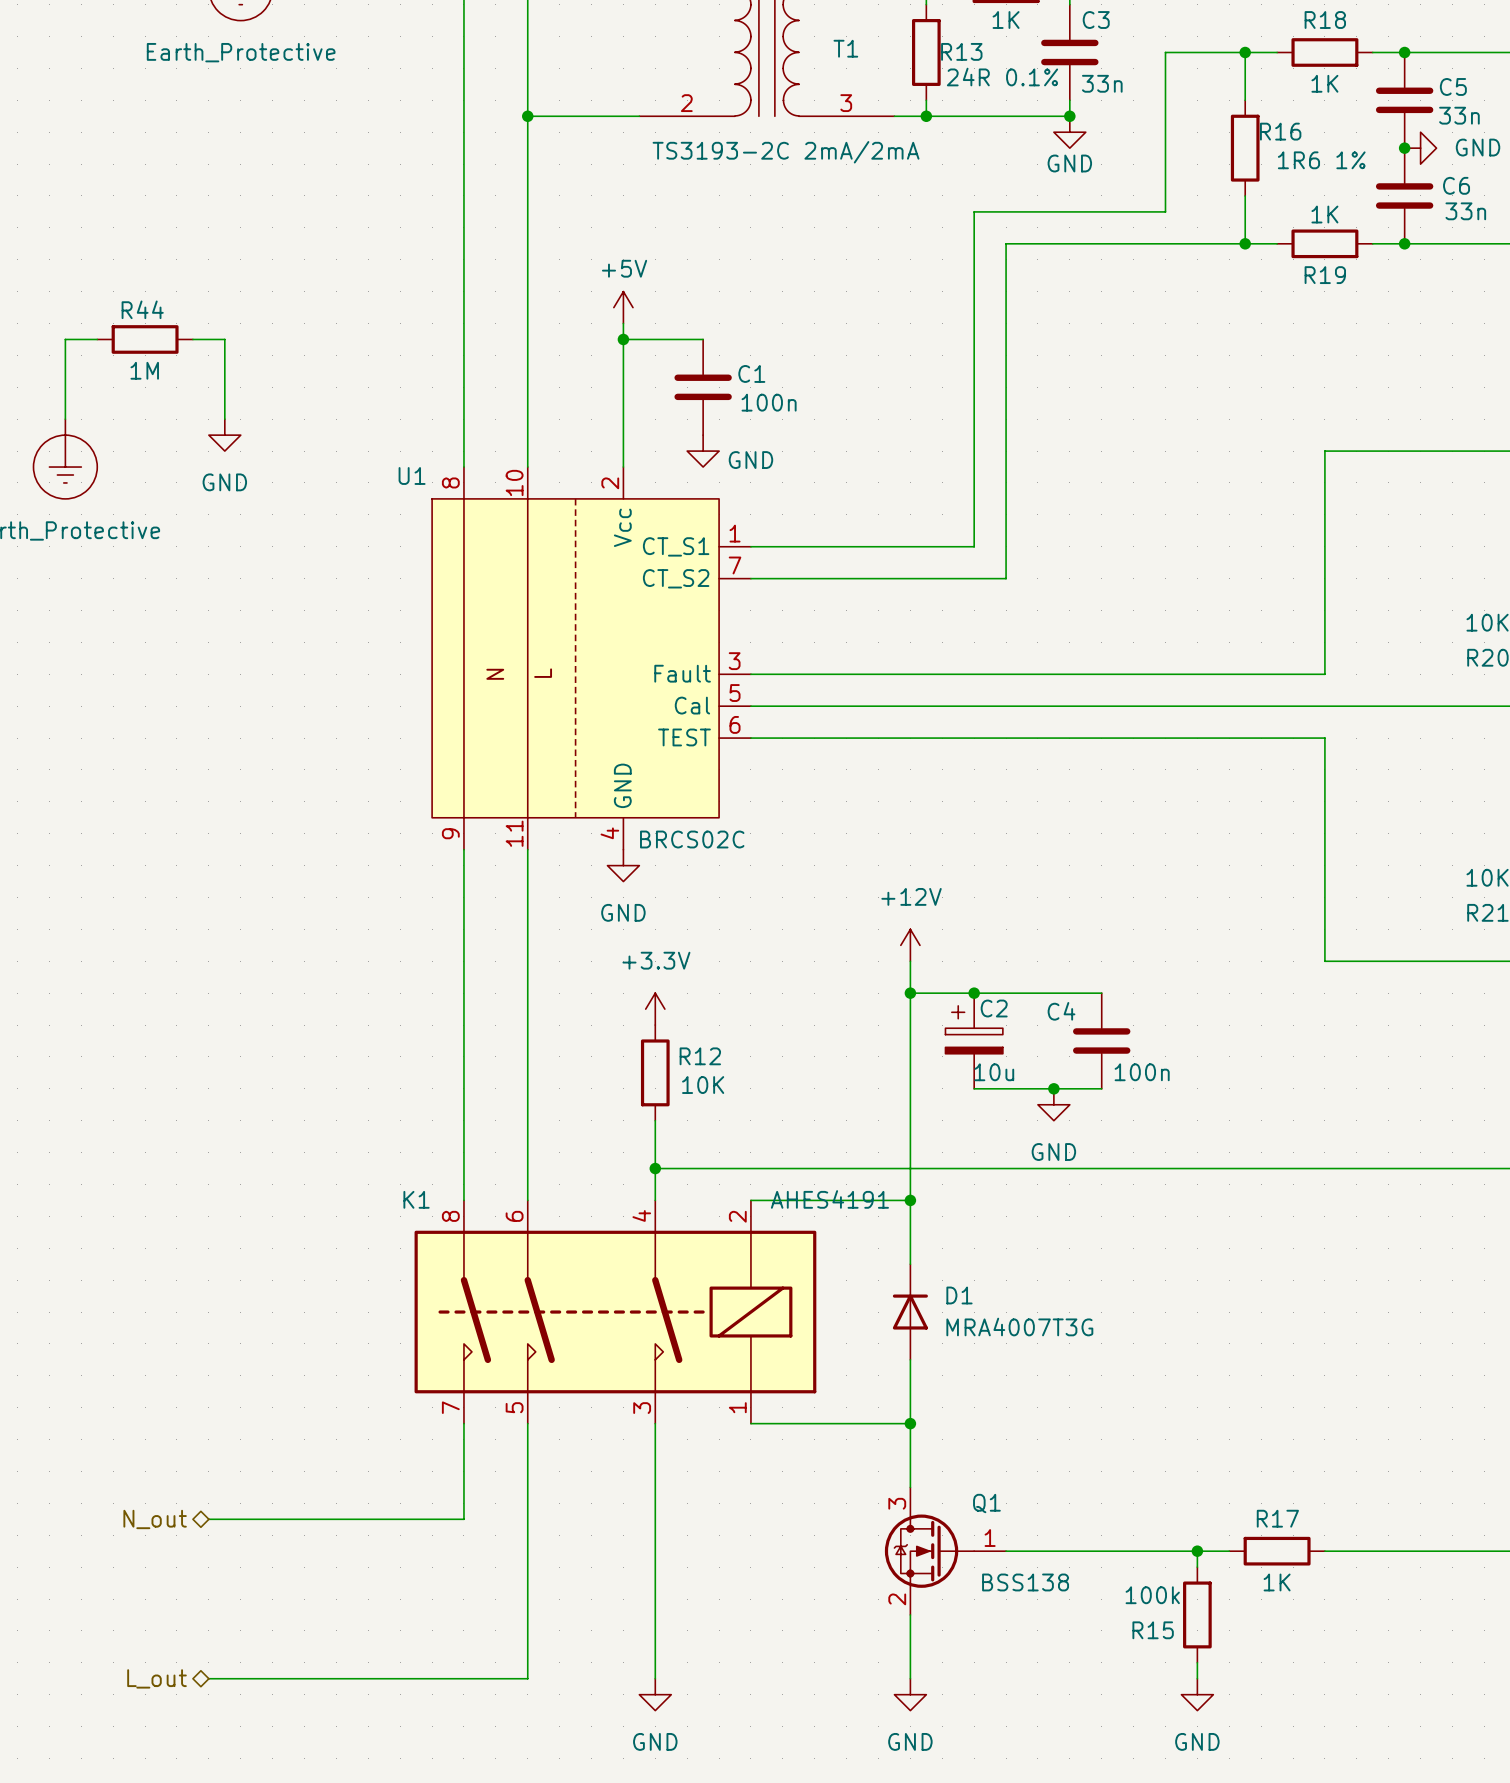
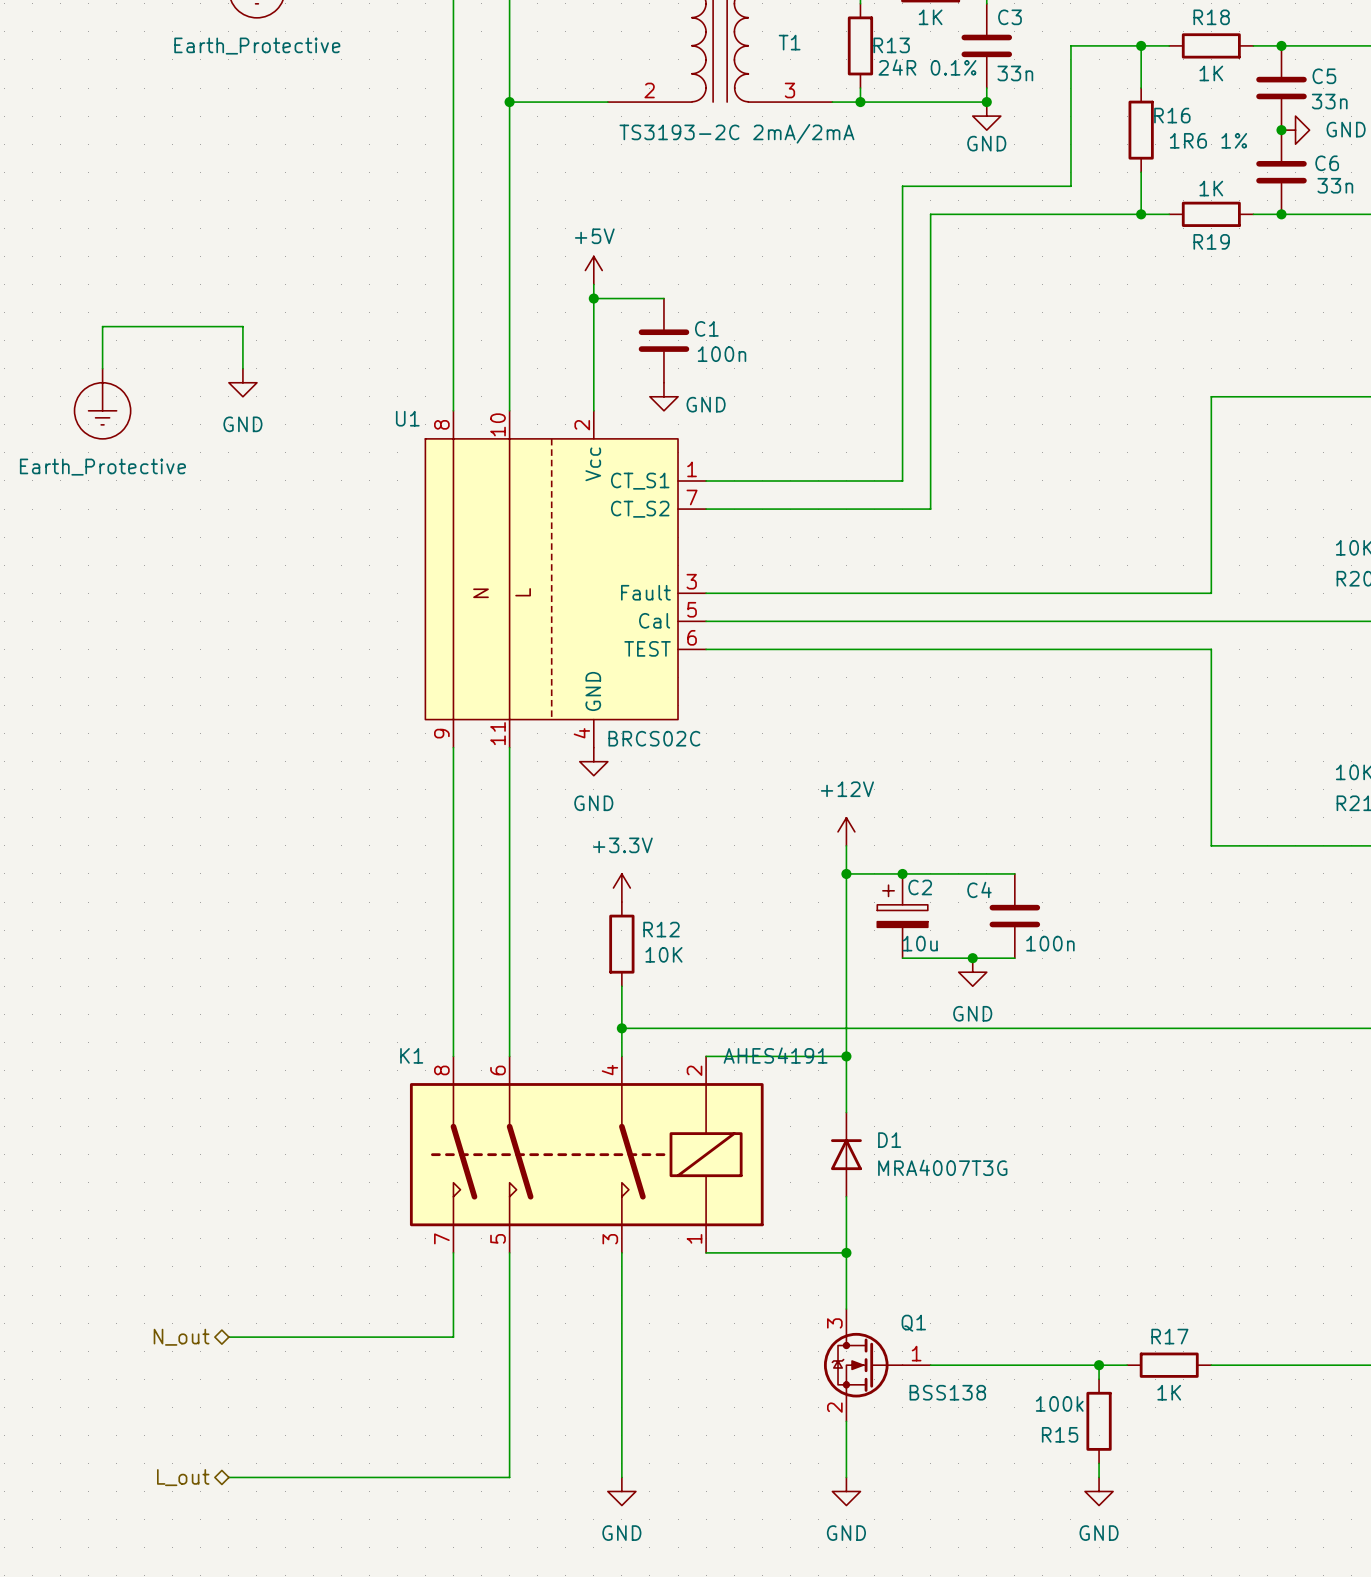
wire: (97, 339) (65, 339) (65, 371) -> (242, 326) (102, 326)
R44: 1M (145, 339) -> none
wire: (192, 339) (224, 339) (224, 371) -> none

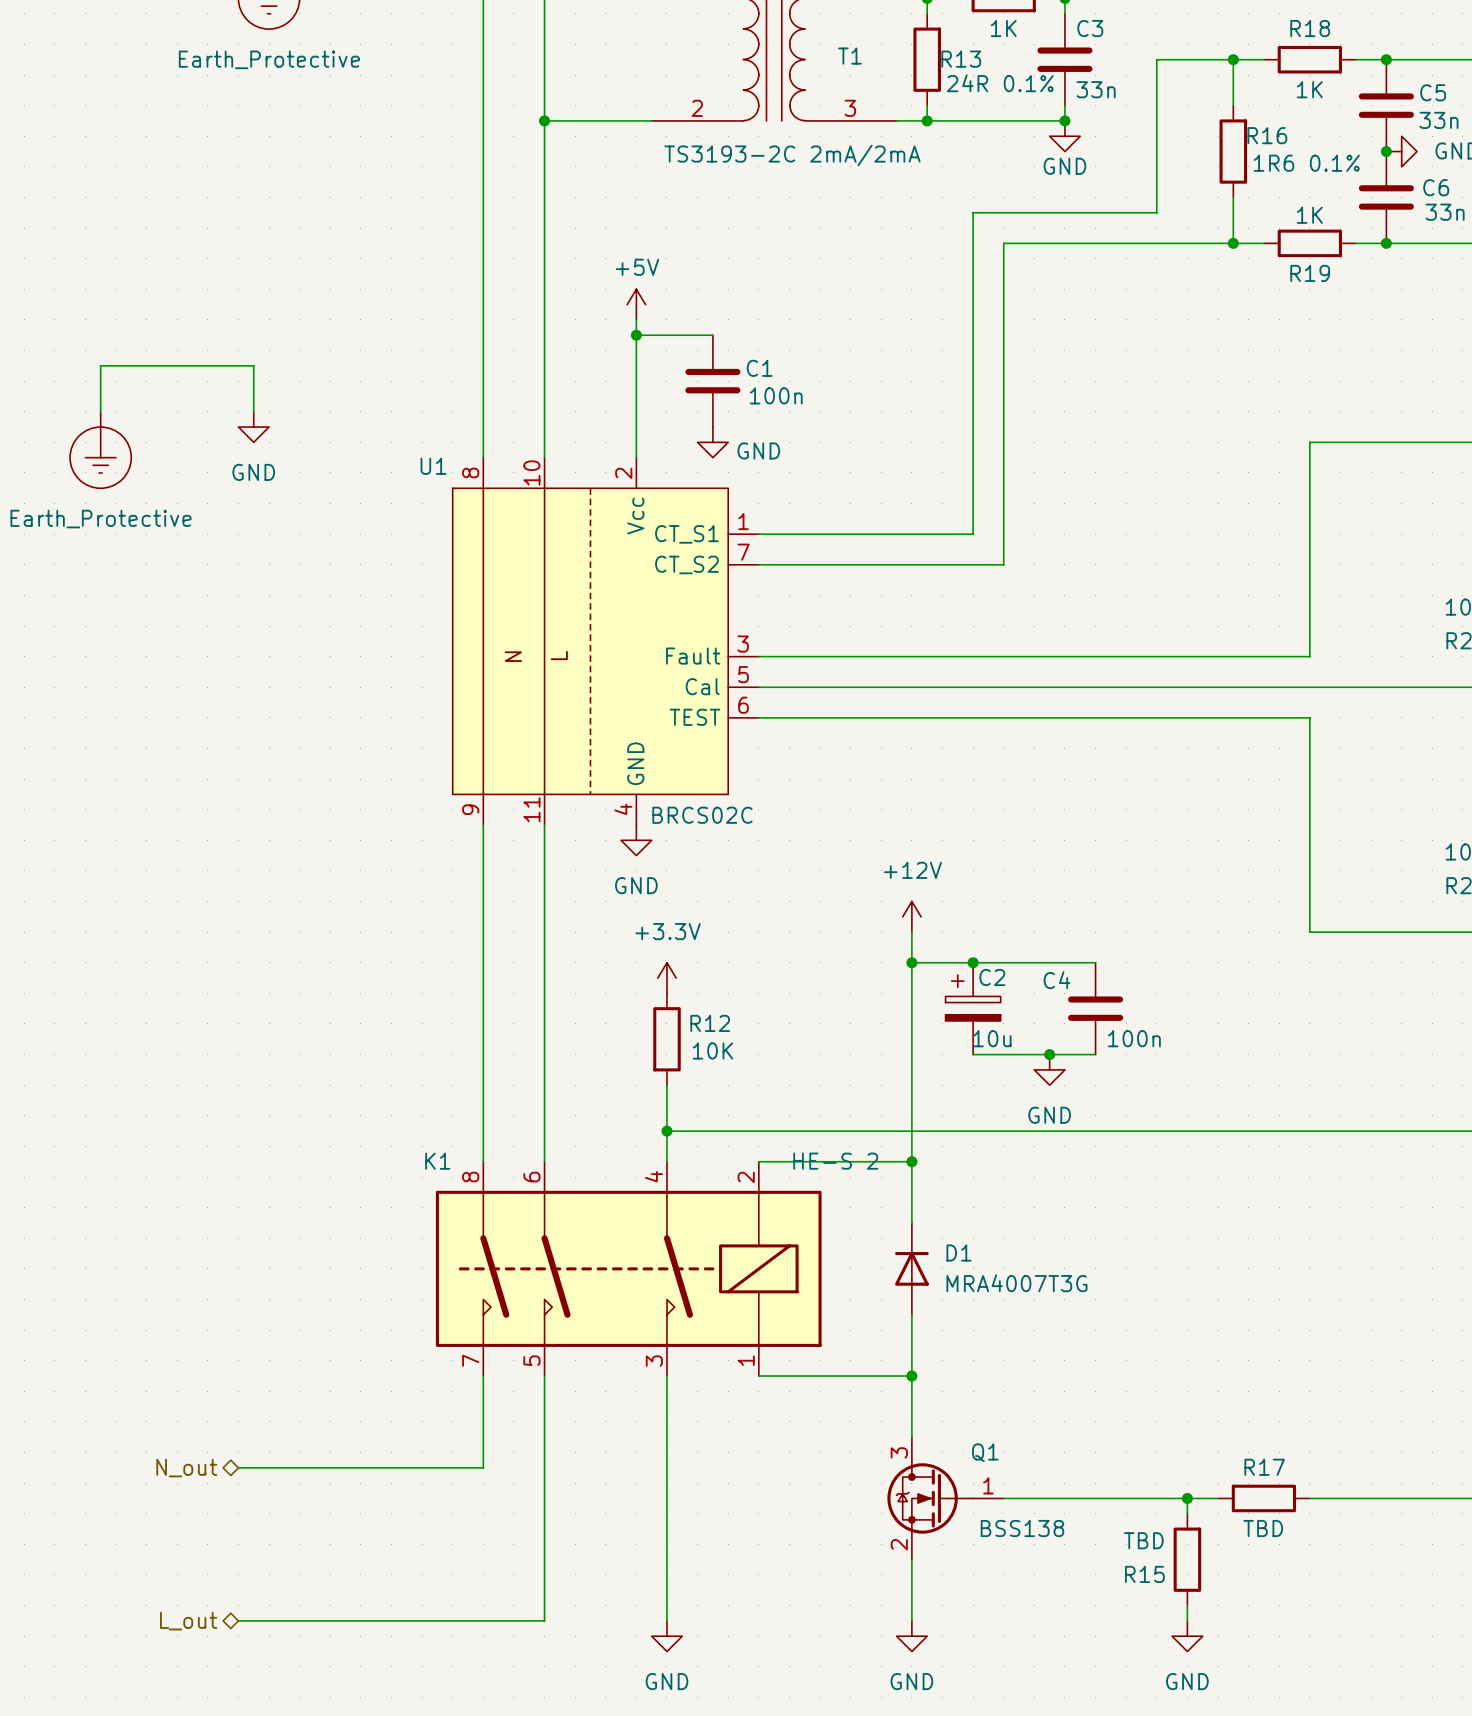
R16 value: 1R6 1% (1208, 140) -> 1R6 0.1% (1306, 163)
K1 value: AHES4191 (775, 1055) -> HE-S 2 (835, 1161)
R17 value: 1K (1169, 1392) -> TBD (1263, 1528)
R15 value: 100k (1059, 1403) -> TBD (1143, 1540)

